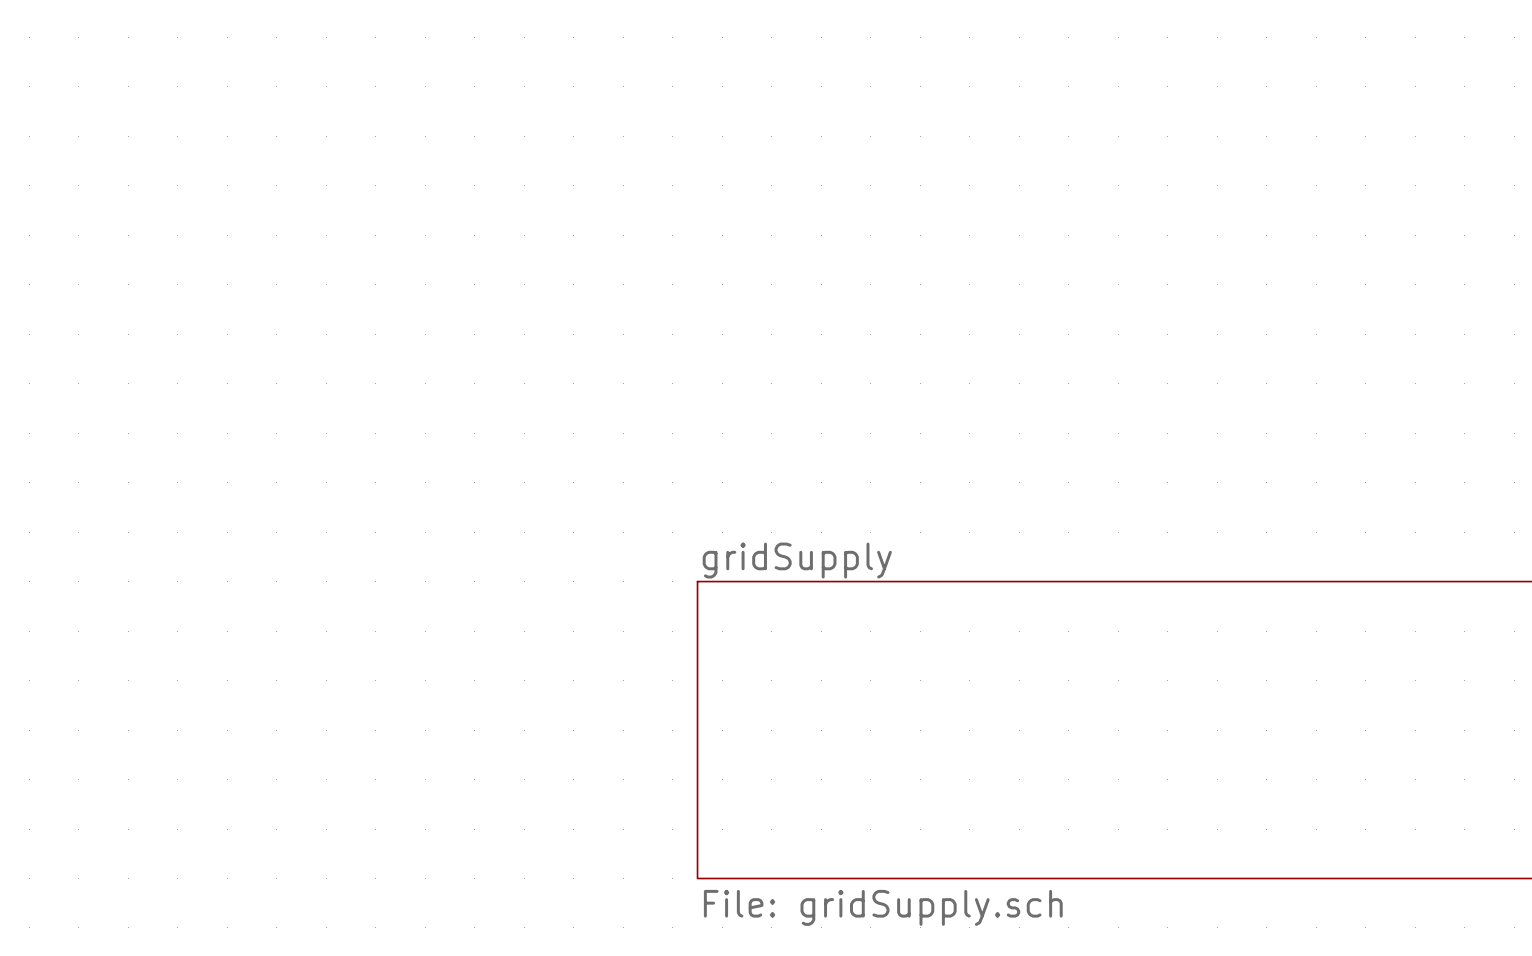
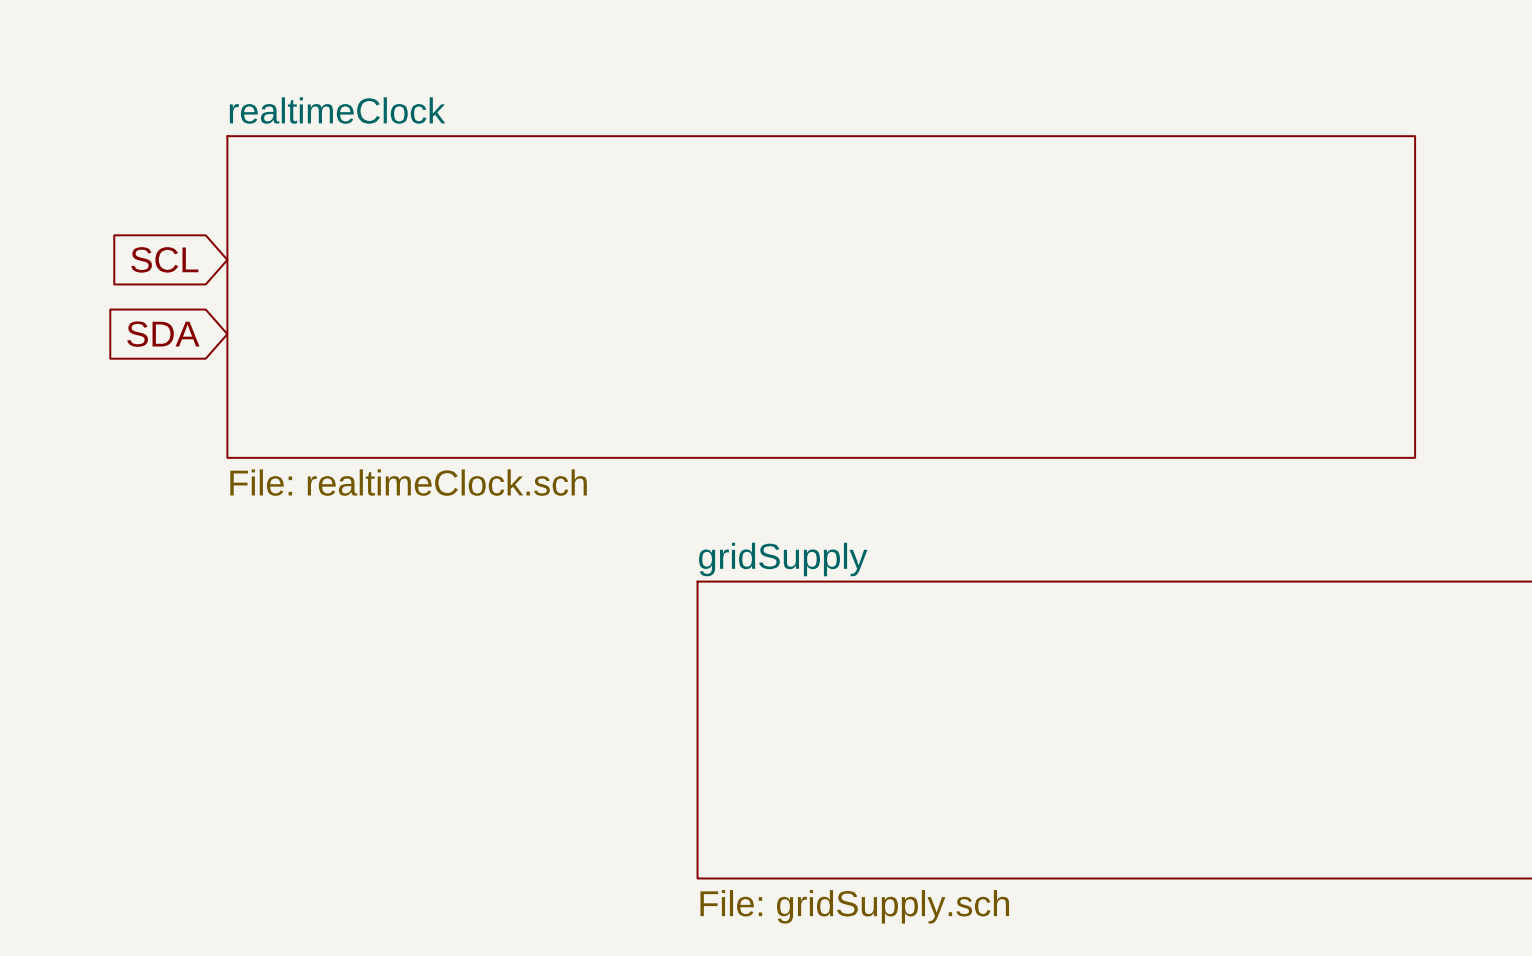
global label: none -> SCL (164, 259)
sheet realtimeClock: none -> File: realtimeClock.sch (821, 297)
global label: none -> SDA (163, 334)

